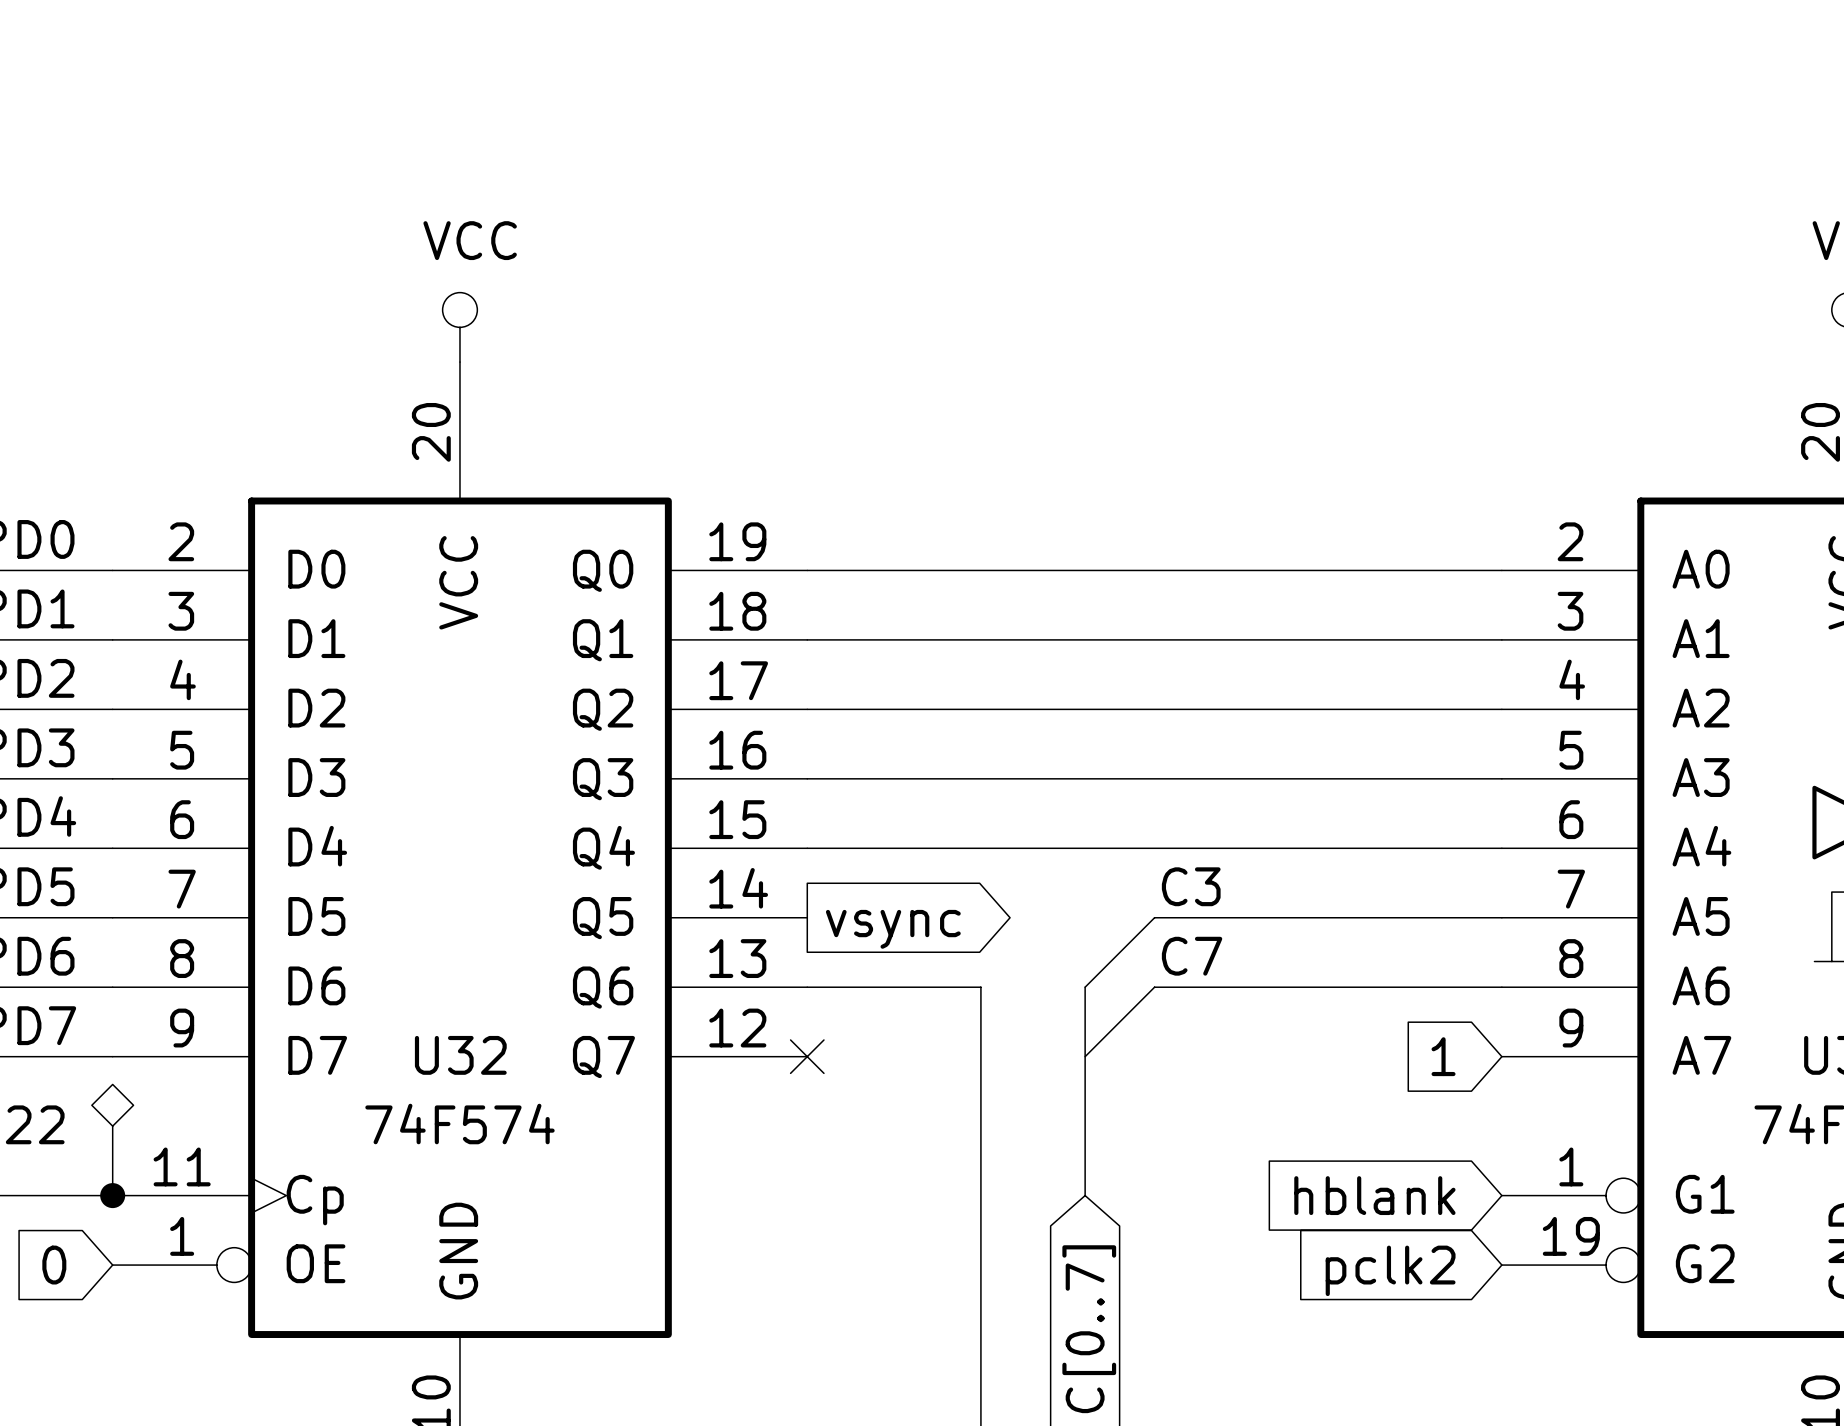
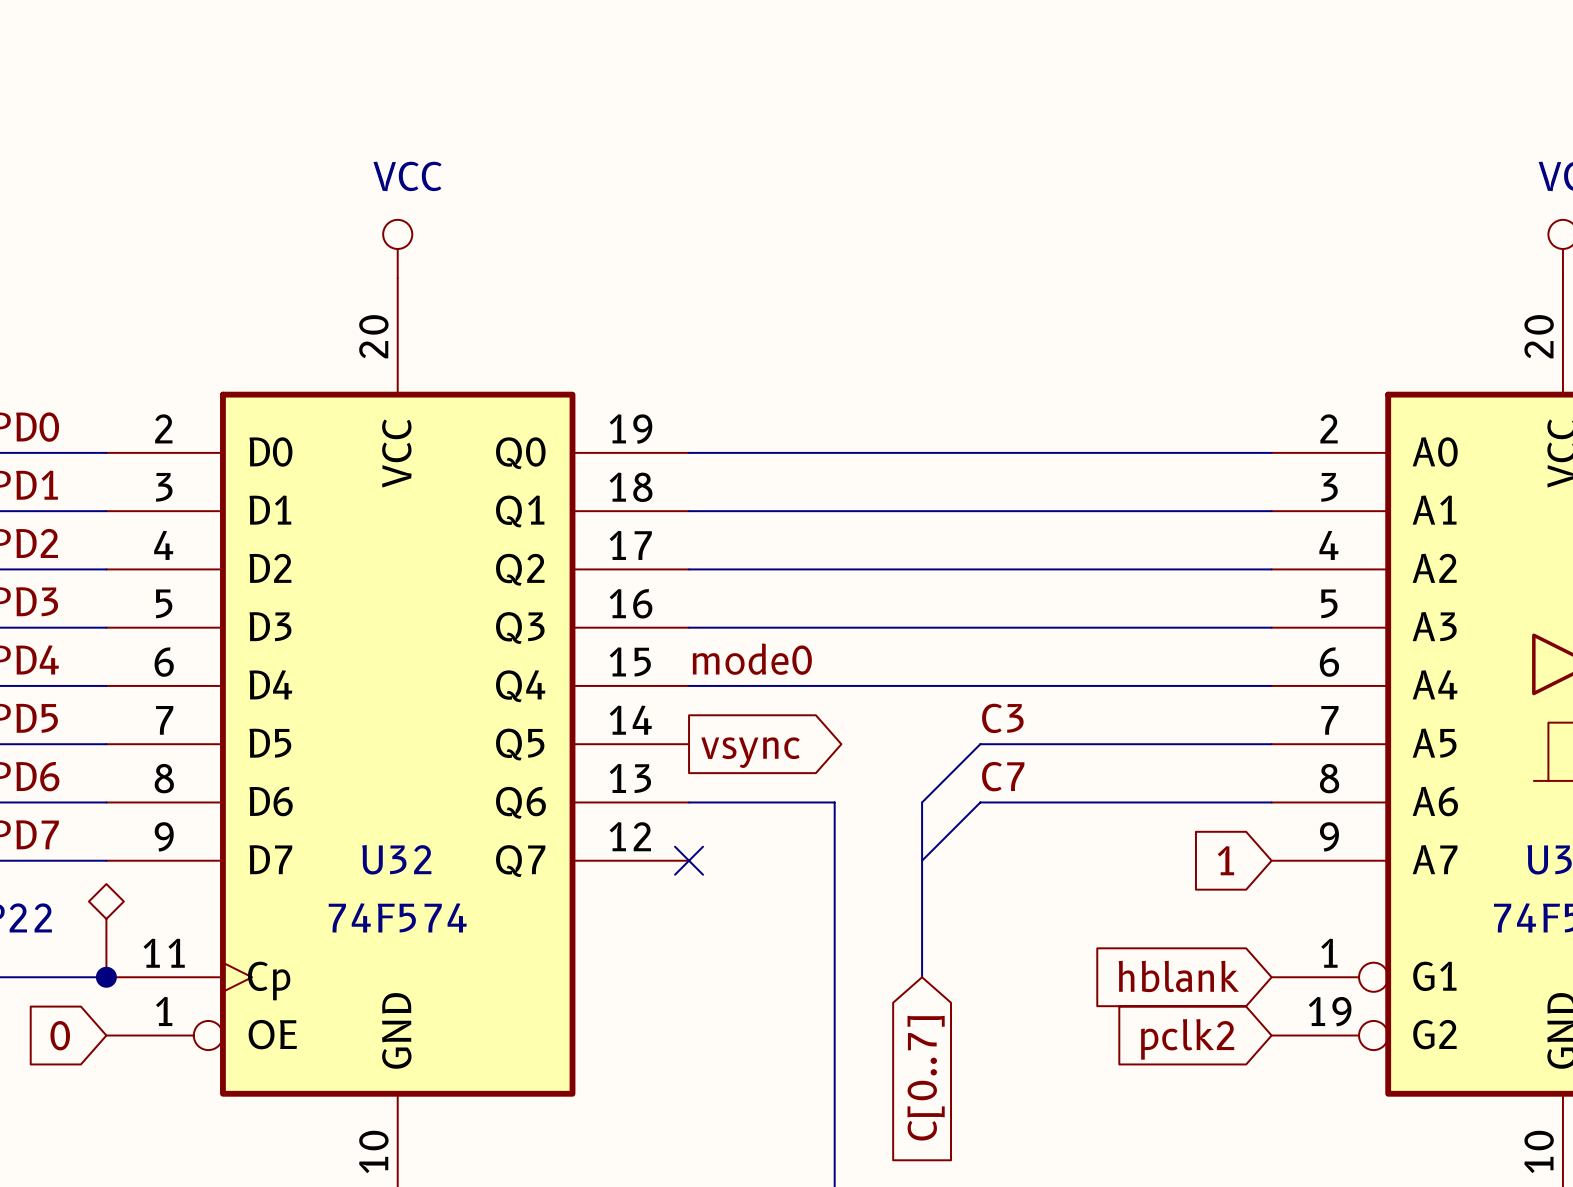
label: none -> mode0 (752, 659)

